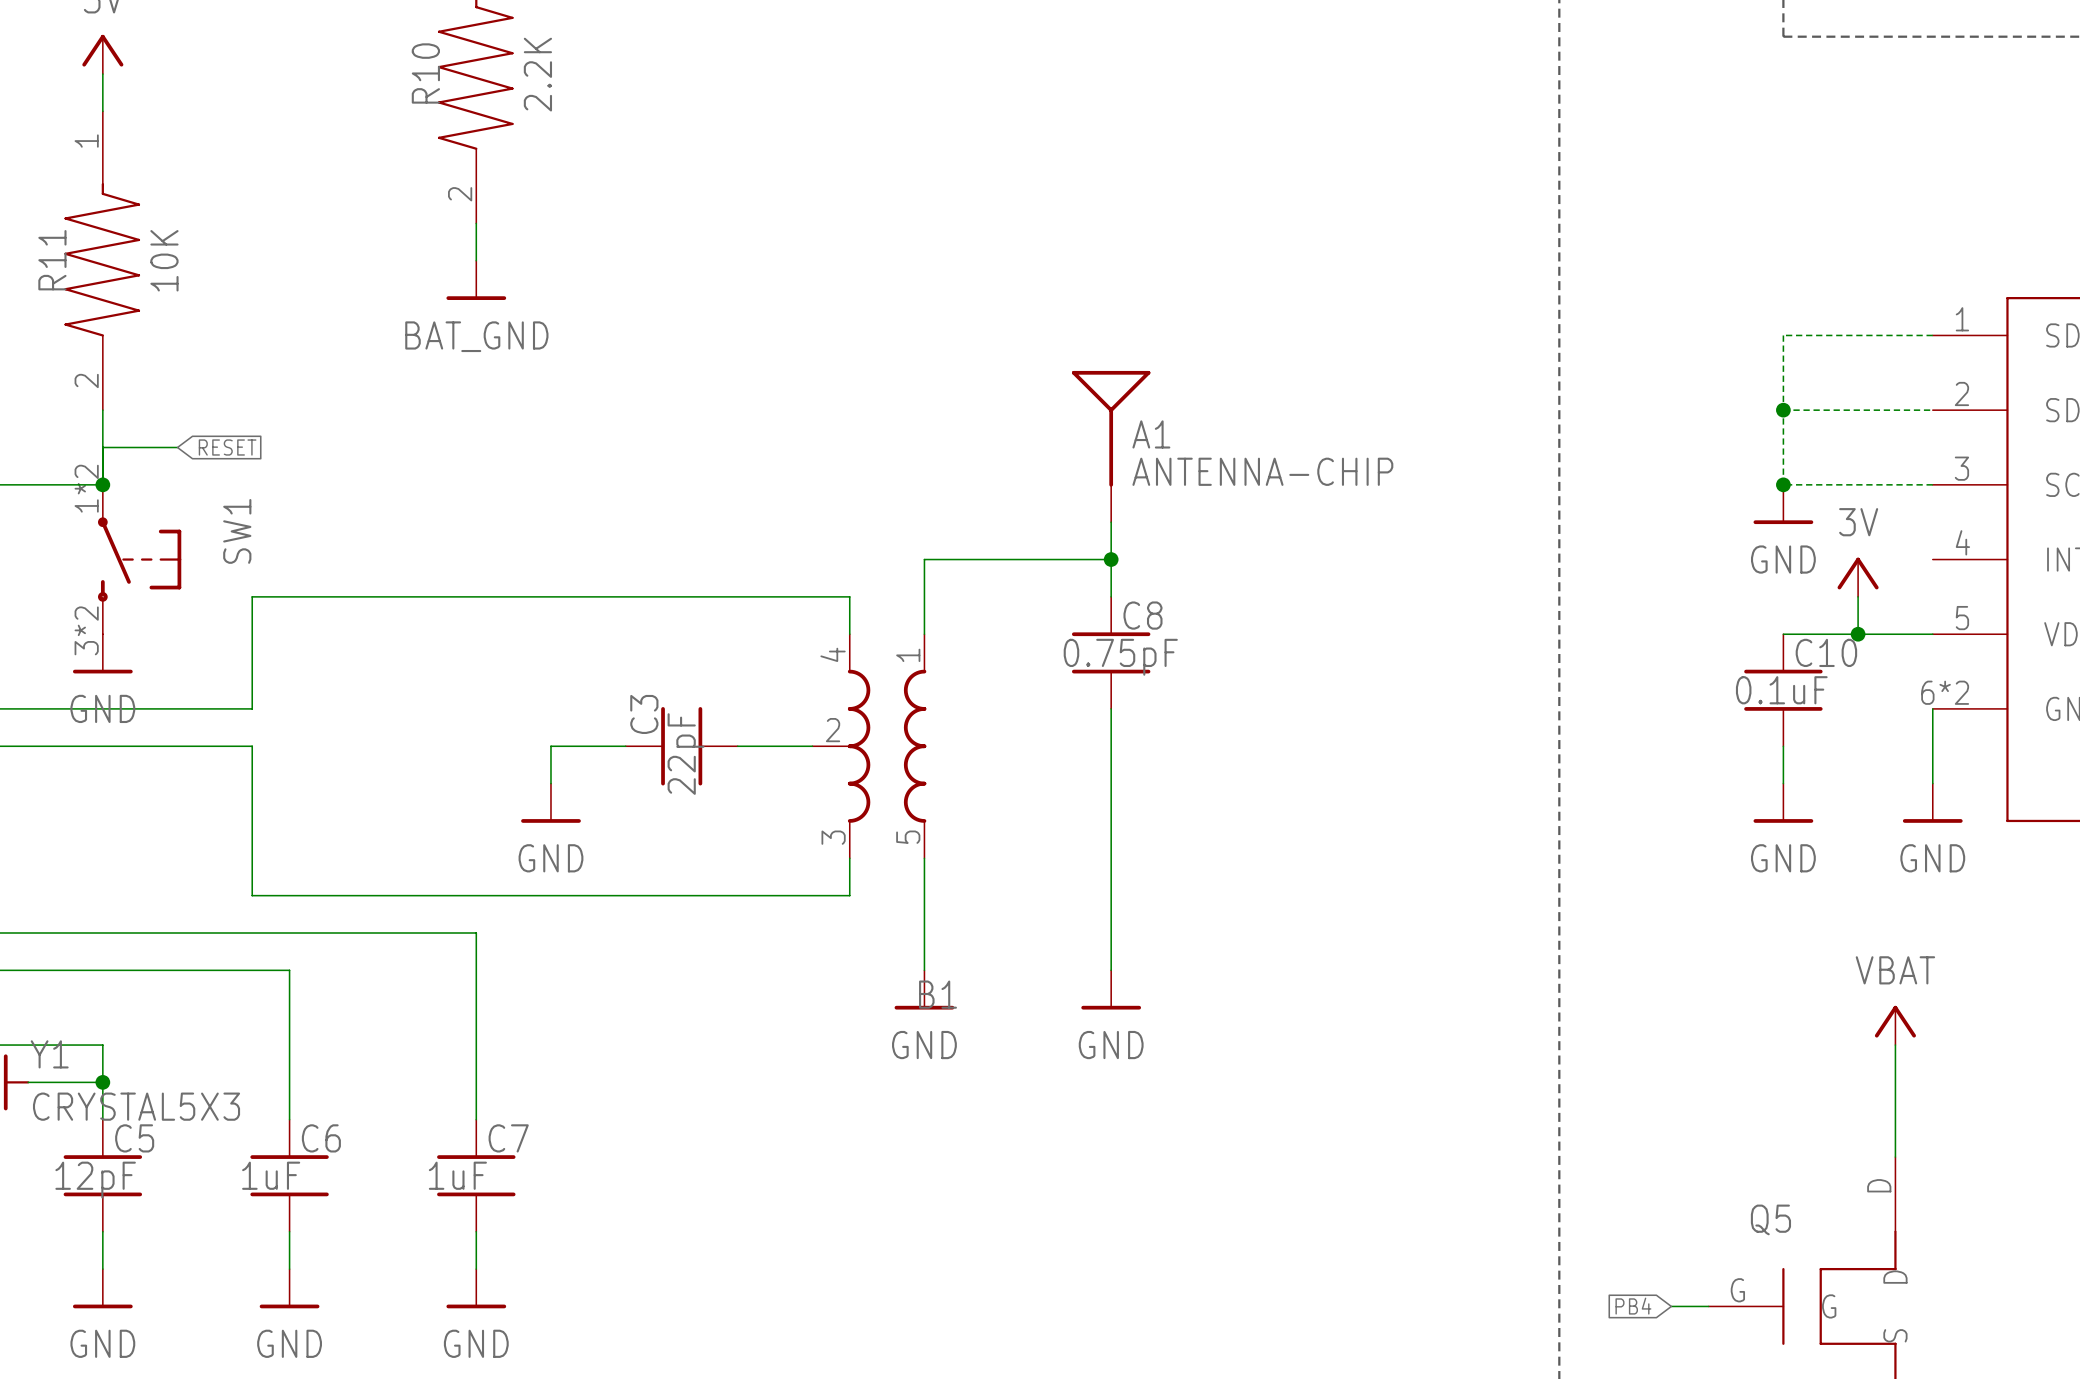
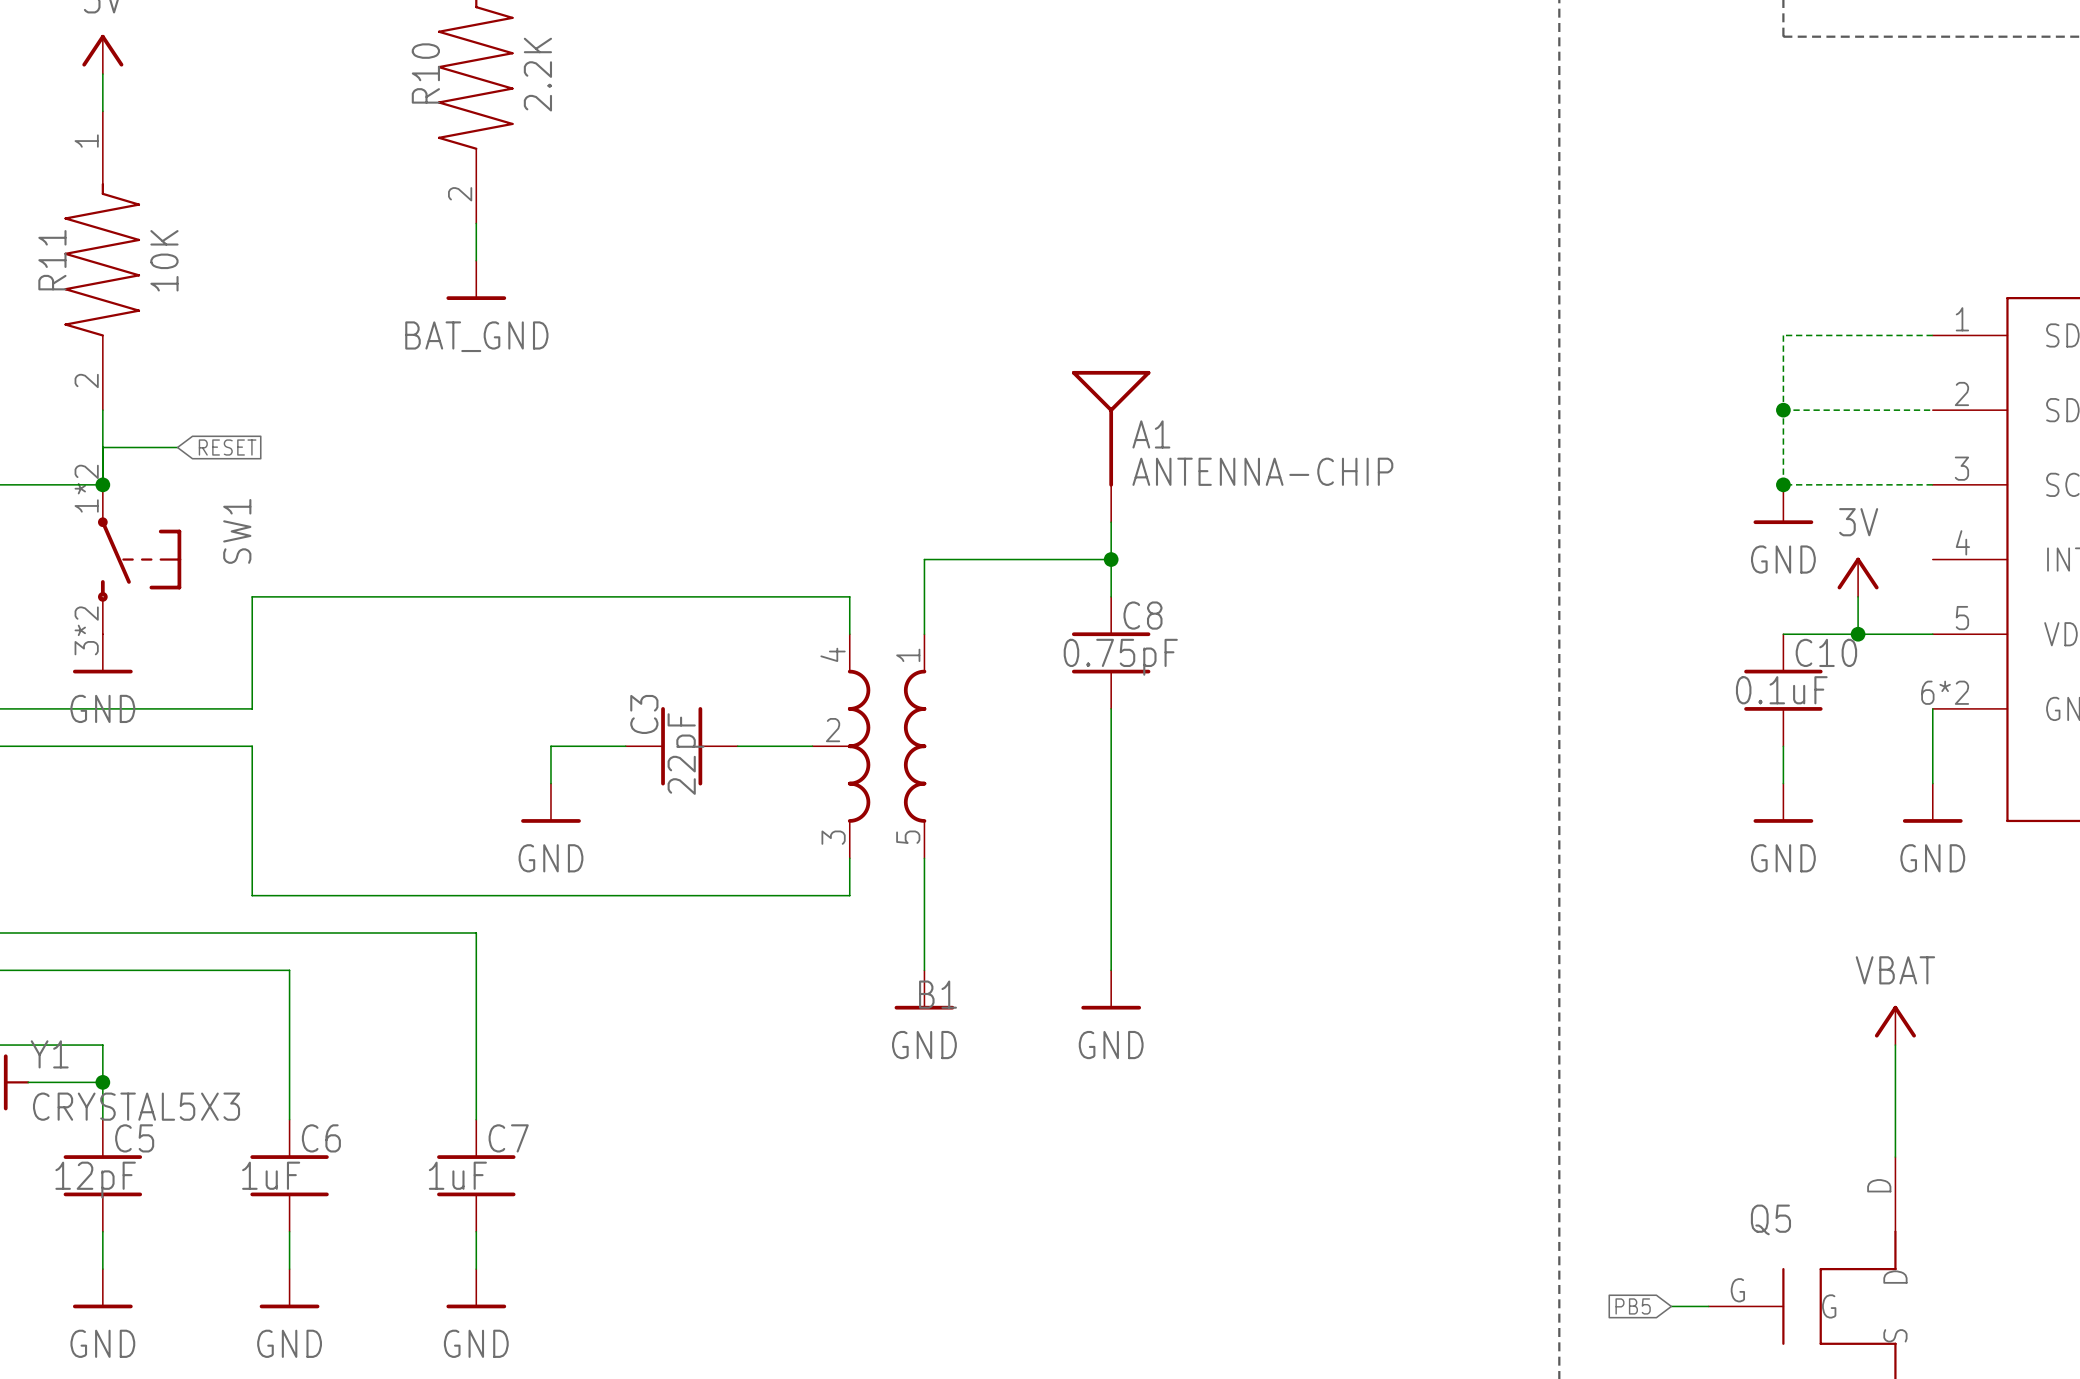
global label: PB4 (1633, 1306) -> PB5 (1633, 1306)

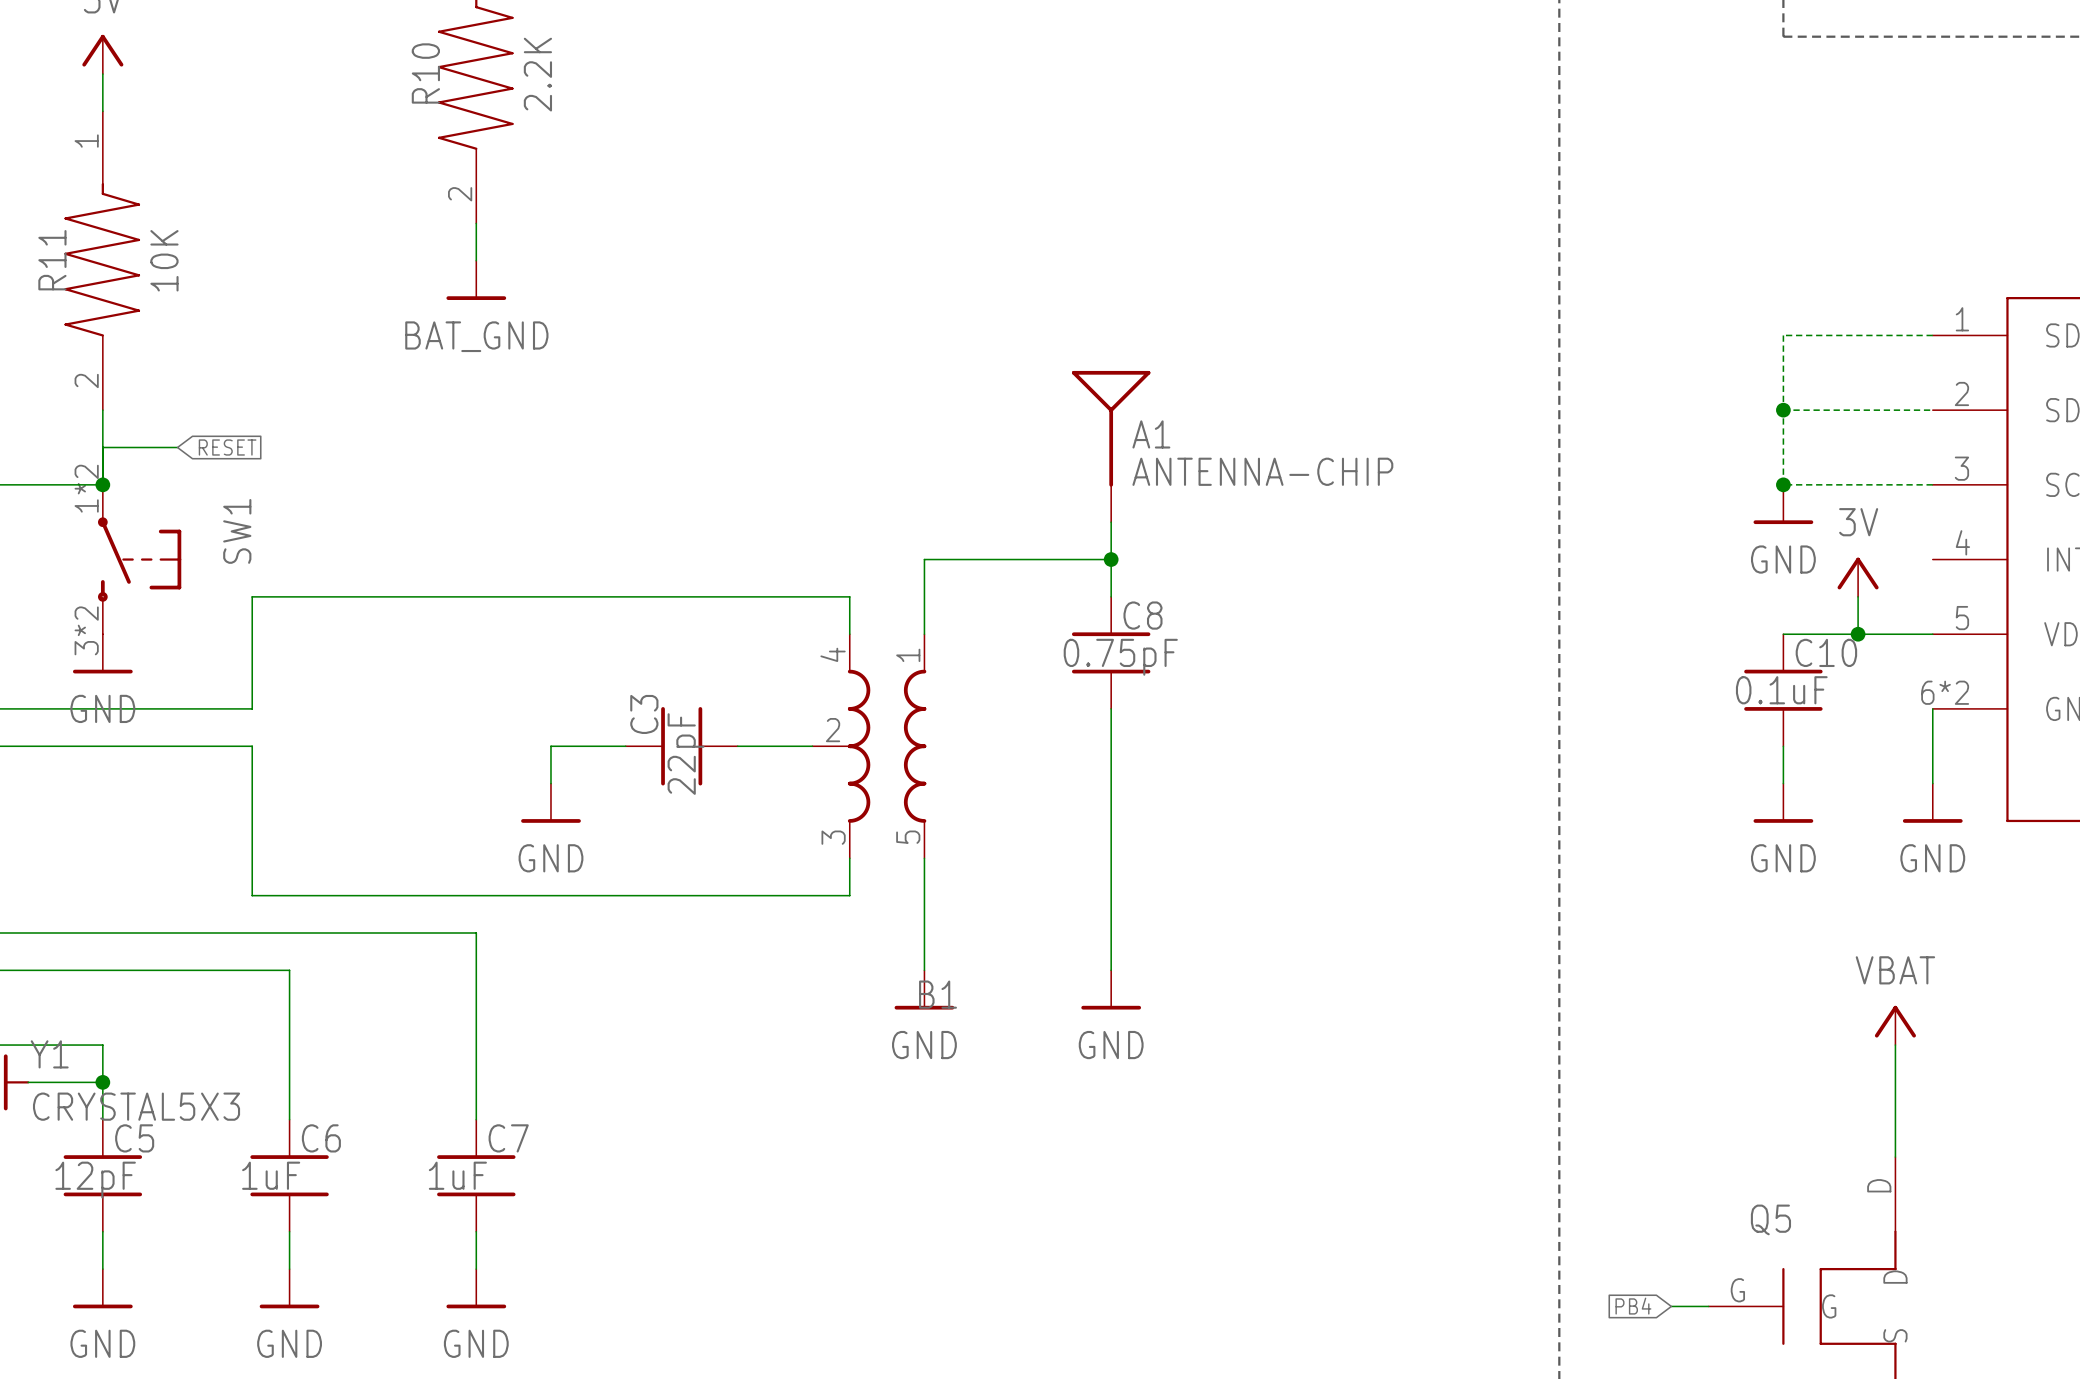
global label: PB5 (1633, 1306) -> PB4 (1633, 1306)

